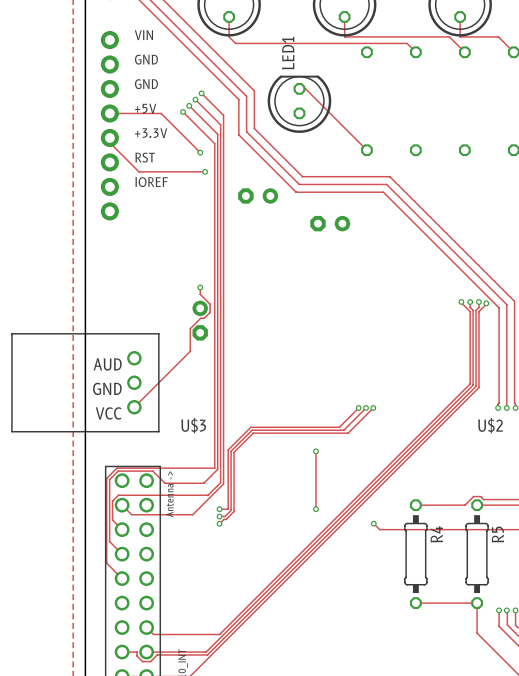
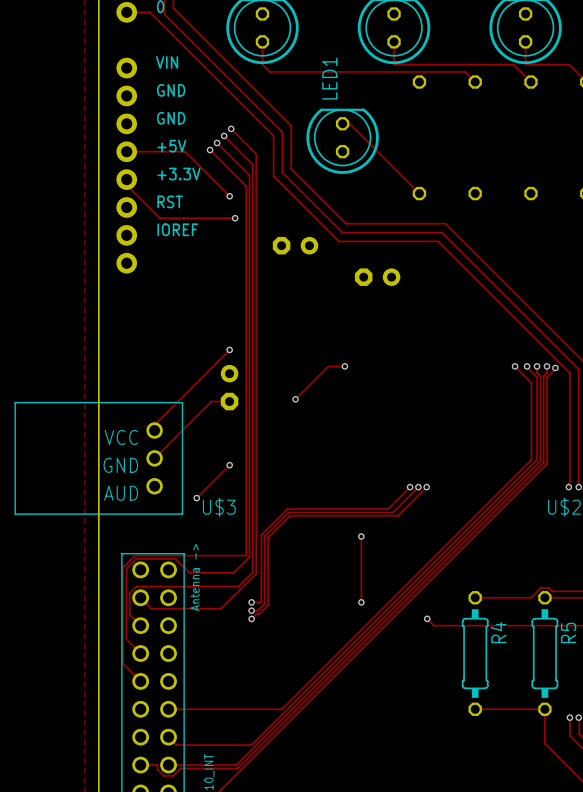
track: (200, 287) (200, 294) (210, 304) (210, 312) (190, 328) (190, 351) (134, 407) -> (229, 349) (154, 425) (154, 430)
track: none -> (344, 366) (328, 366) (295, 399)
via: none -> (344, 366)
track: none -> (515, 366) (531, 382) (531, 459) (281, 709) (168, 709)
via: none -> (515, 366)
via: none -> (295, 399)
track: none -> (229, 401) (211, 401) (154, 458)
U$3 text: AUD (107, 364) -> VCC (121, 437)
track: none -> (229, 465) (196, 498)
via: none -> (229, 465)
U$3 text: VCC (108, 413) -> AUD (121, 493)
via: none -> (196, 498)

